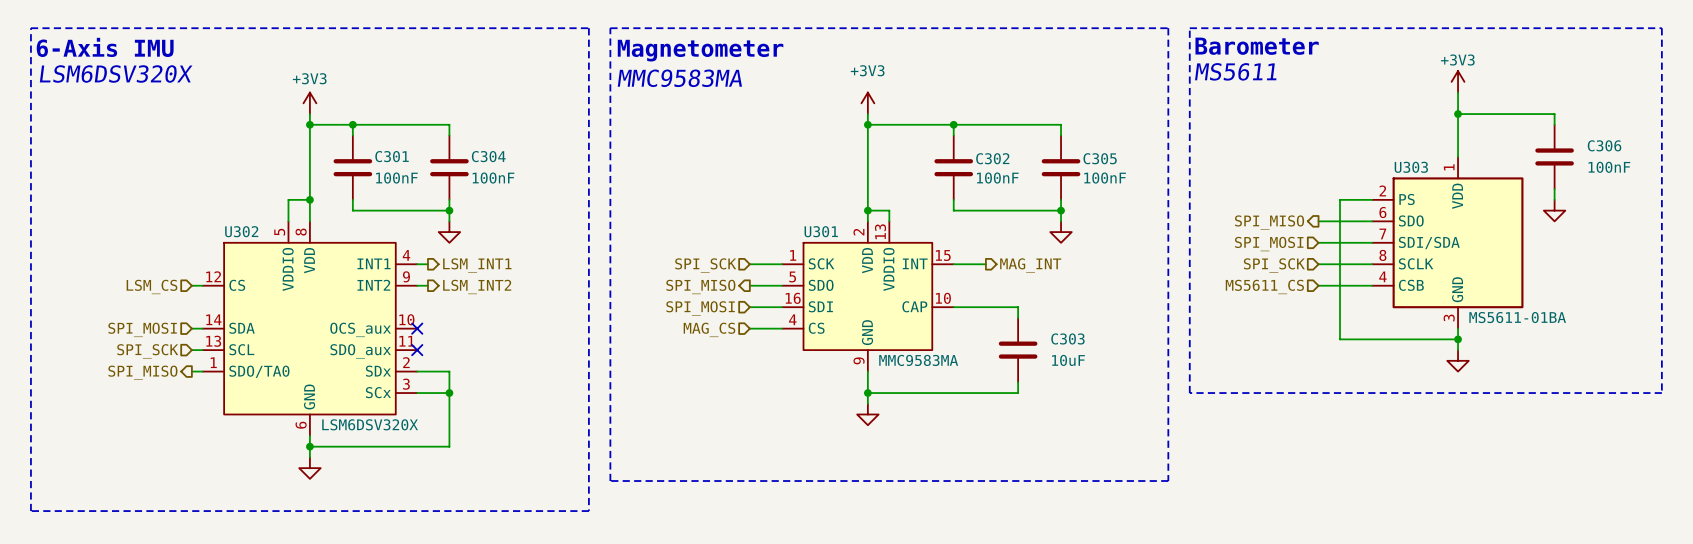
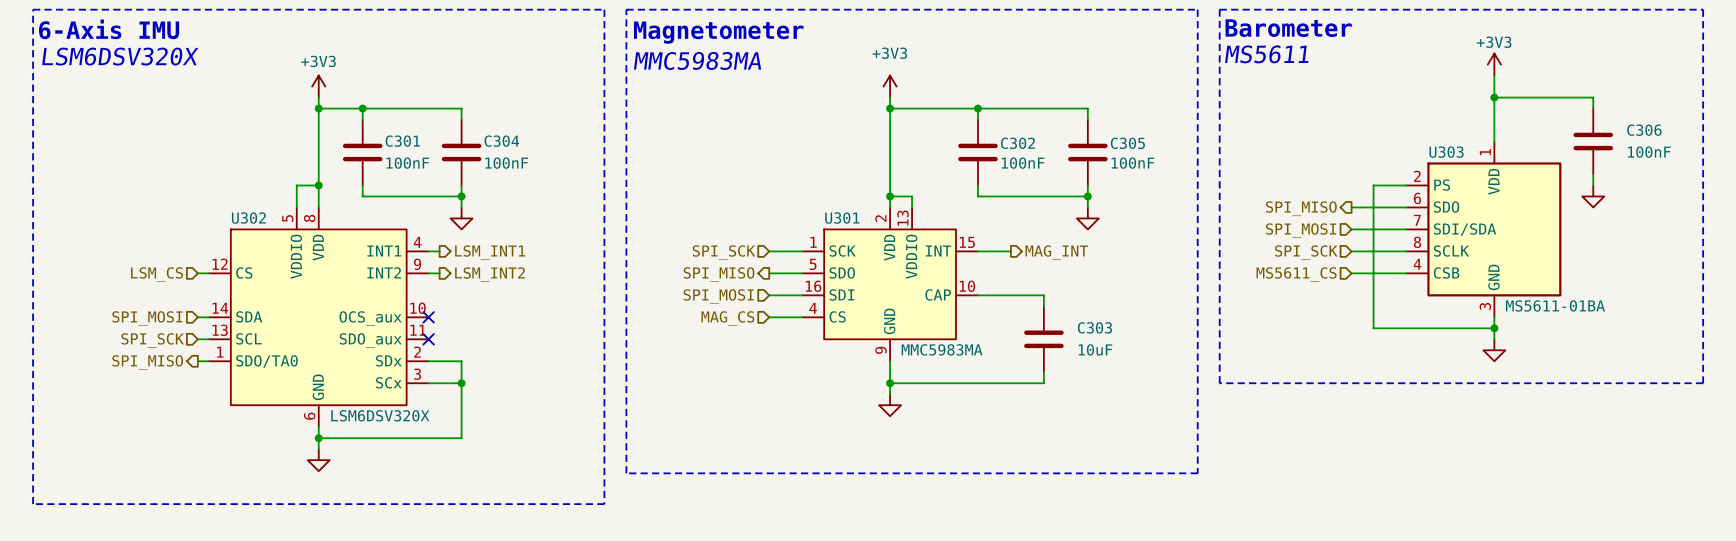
text: MMC9583MA (679, 78) -> MMC5983MA (697, 60)
U301 value: MMC9583MA (918, 360) -> MMC5983MA (942, 349)

